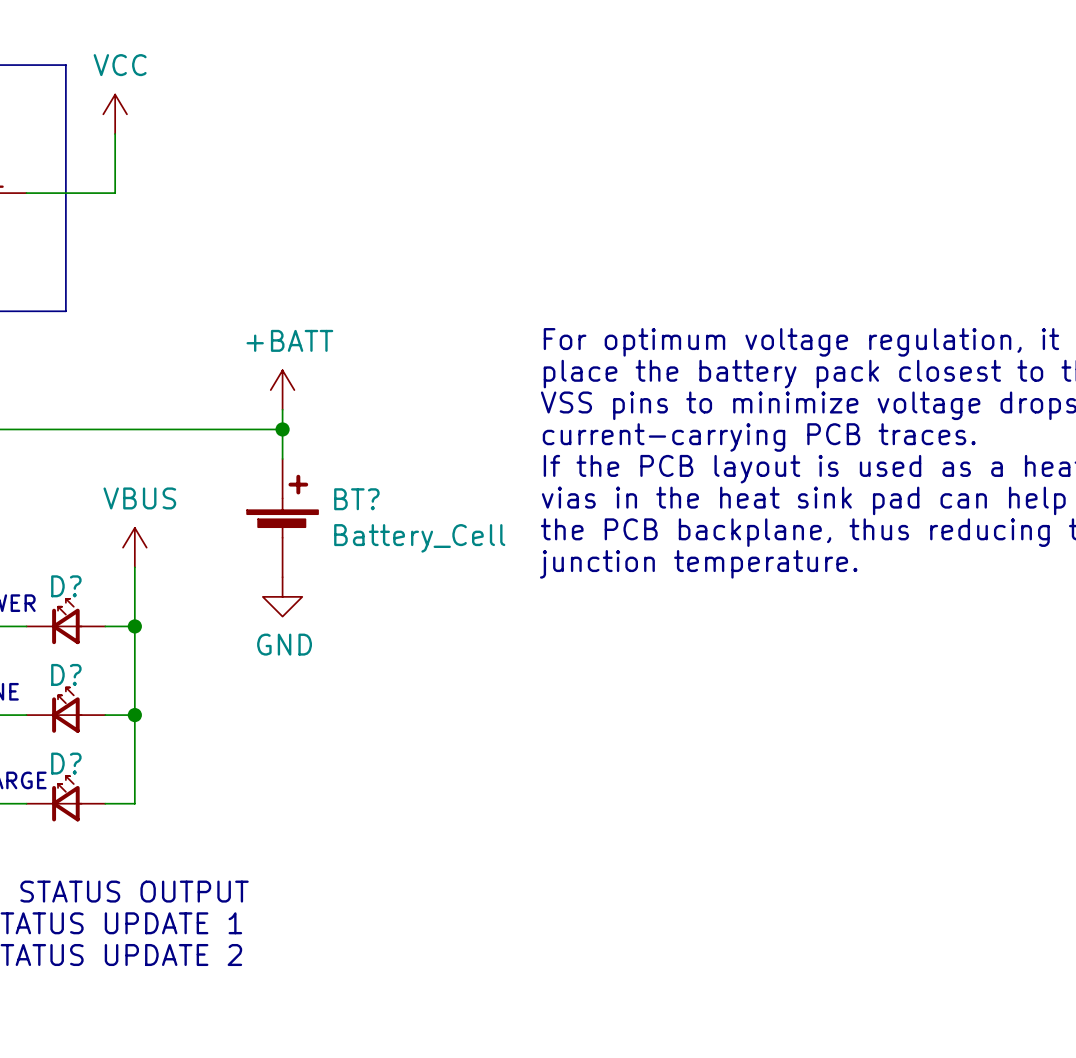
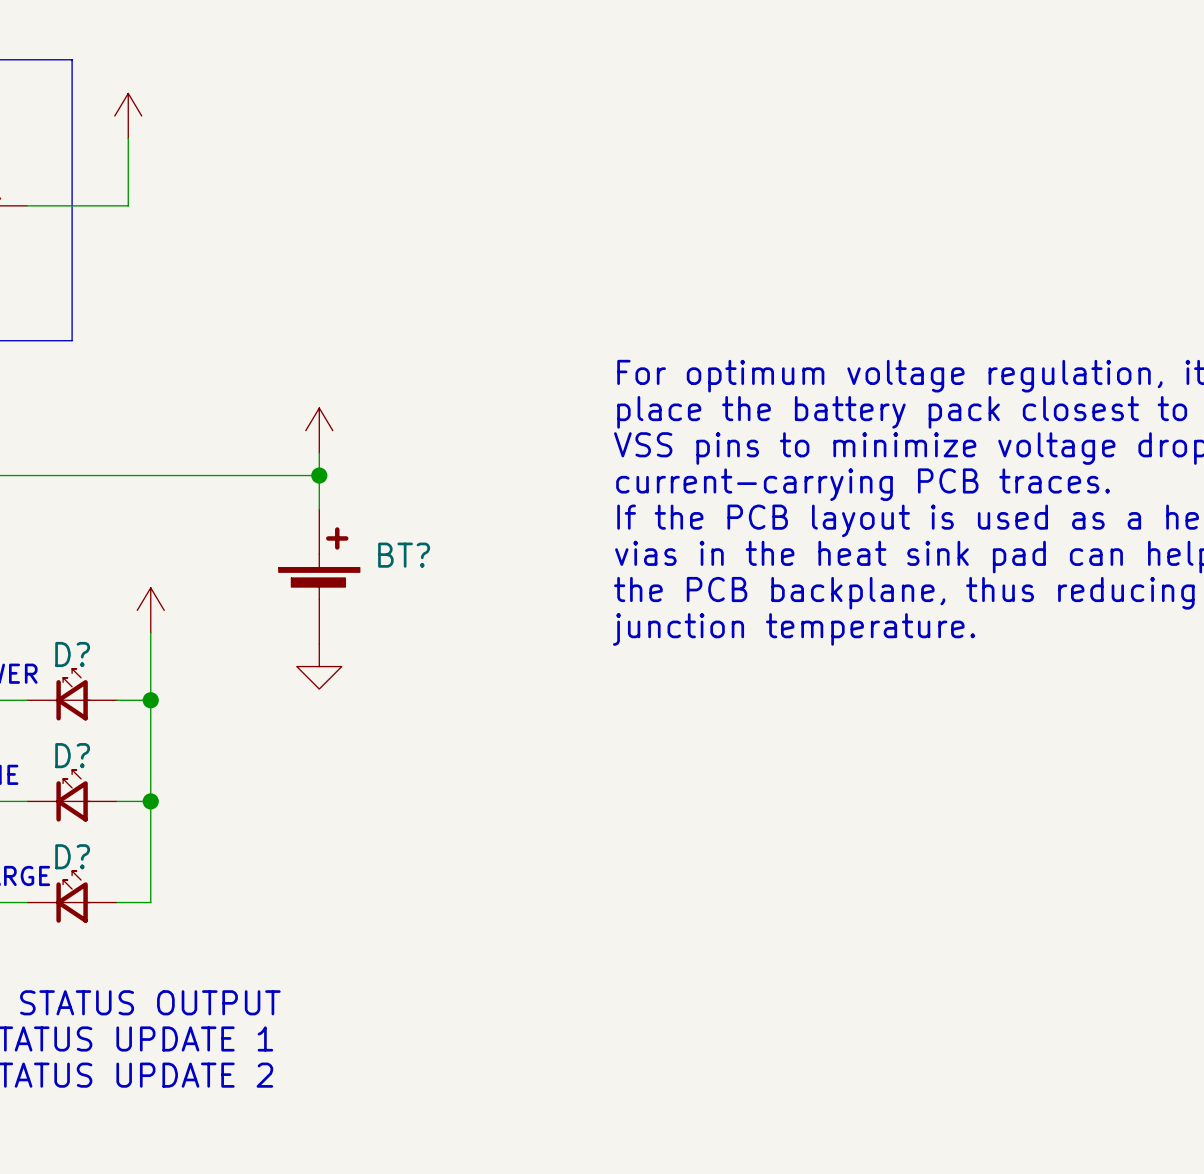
power symbol text: VCC (120, 65) -> none
power symbol text: +BATT (289, 340) -> none
power symbol text: VBUS (139, 498) -> none
BT? value: Battery_Cell (419, 538) -> none
power symbol text: GND (284, 644) -> none

